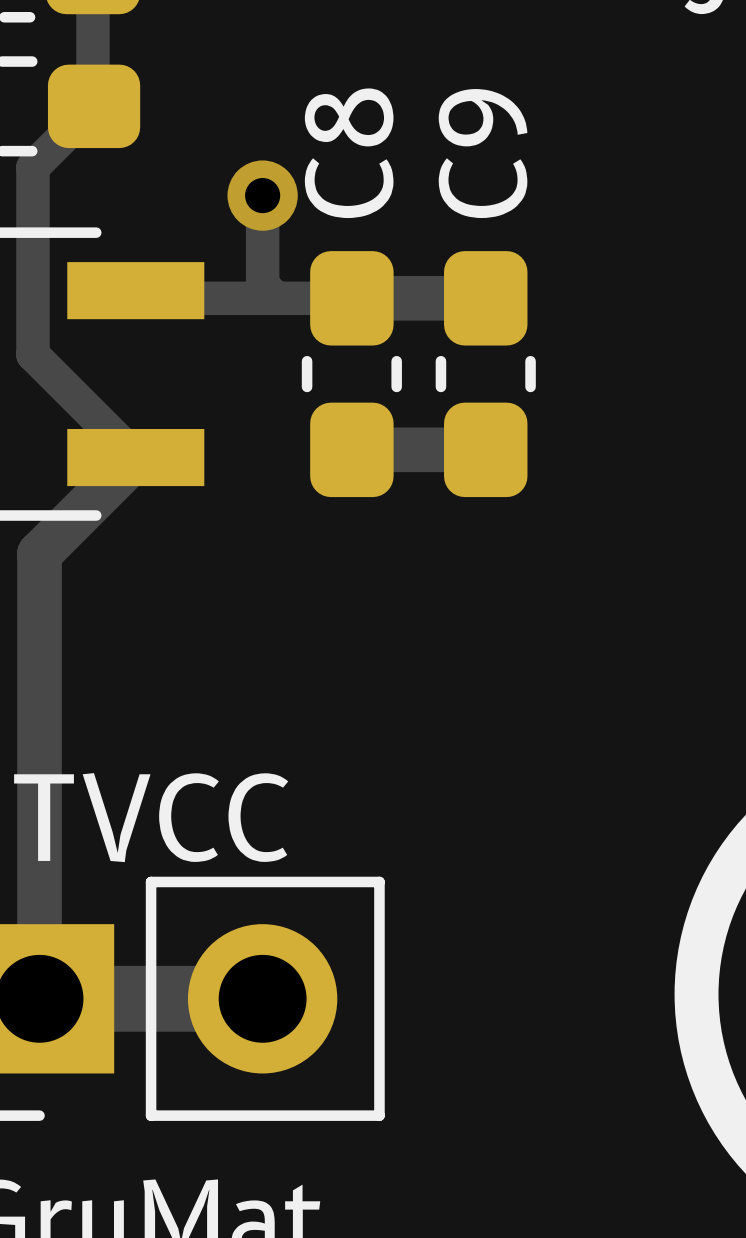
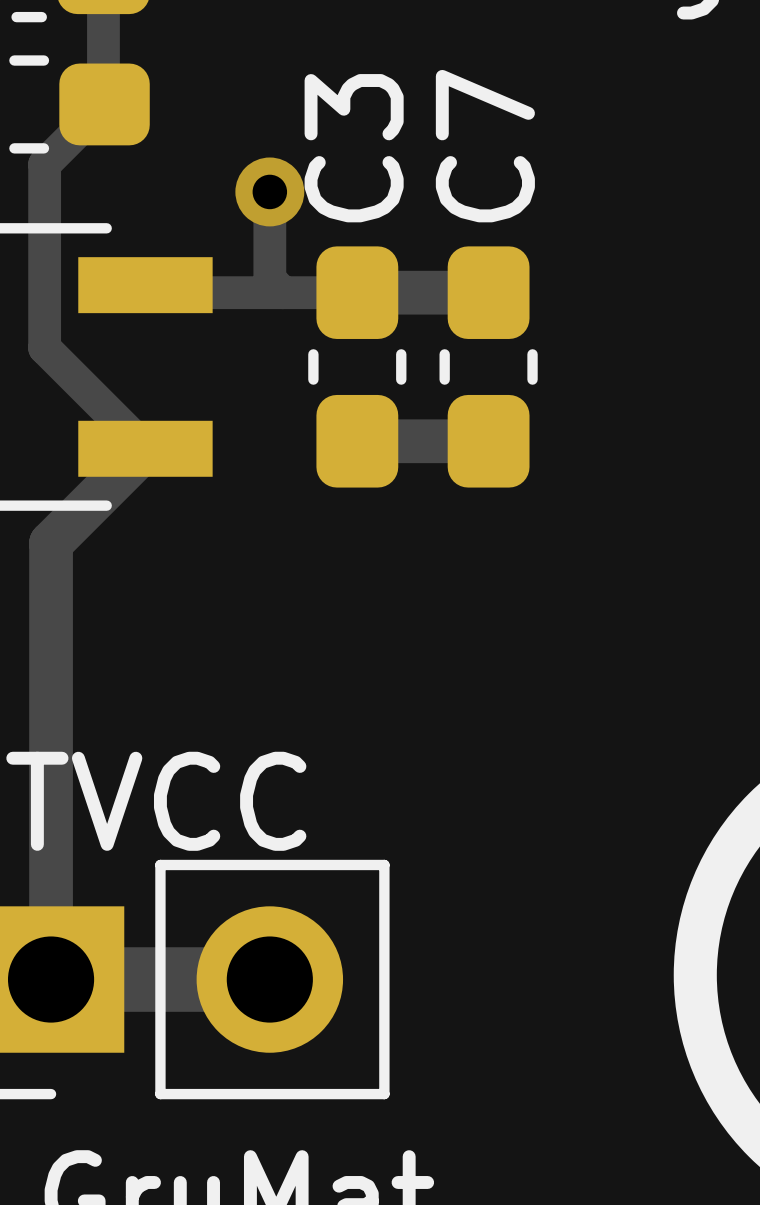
C8 name: C8 (349, 153) -> C3 (354, 148)
C9 name: C9 (483, 153) -> C7 (485, 146)

